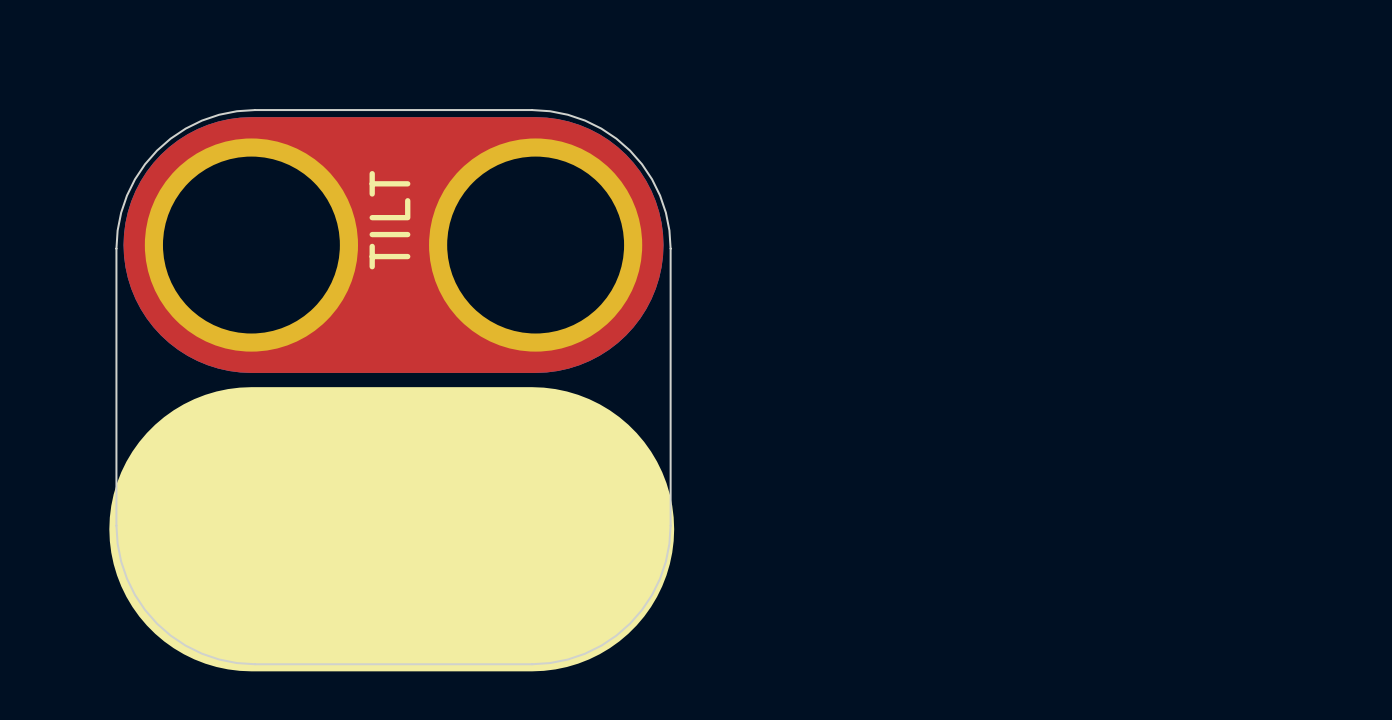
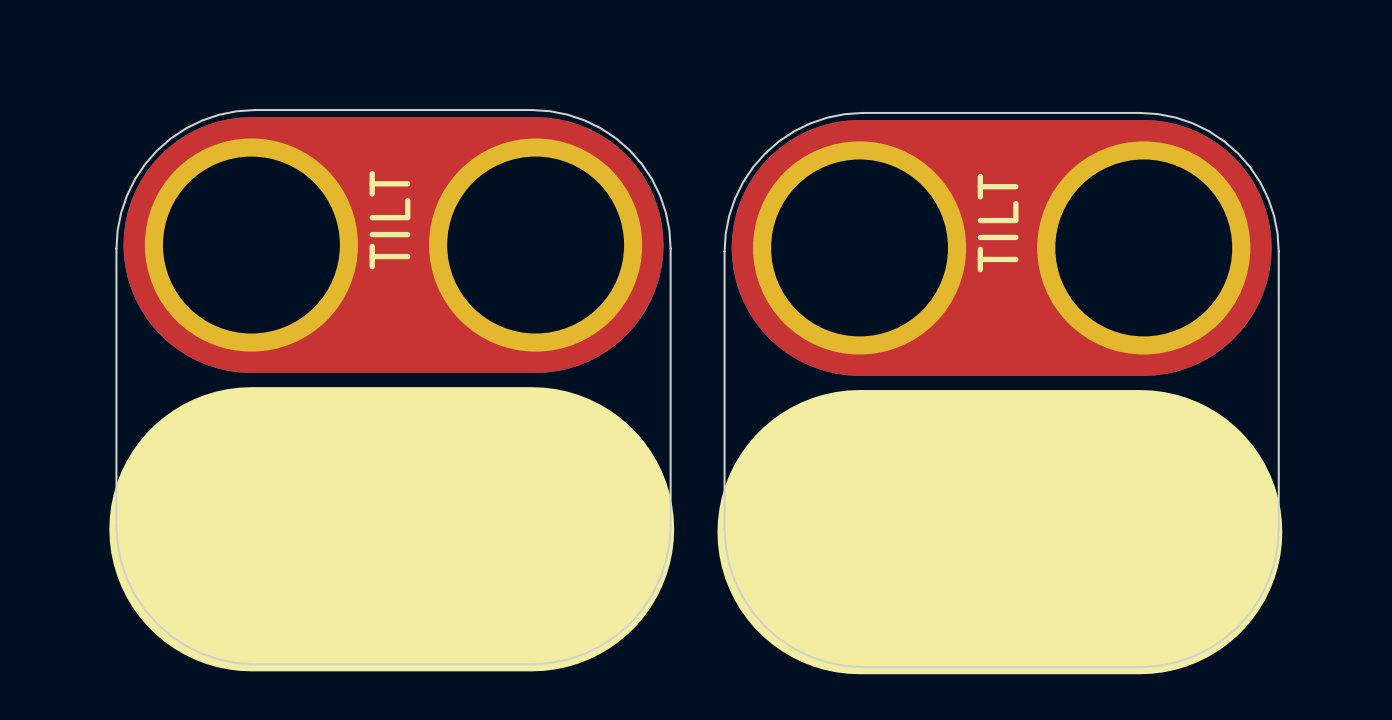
part: none -> (999, 393)

